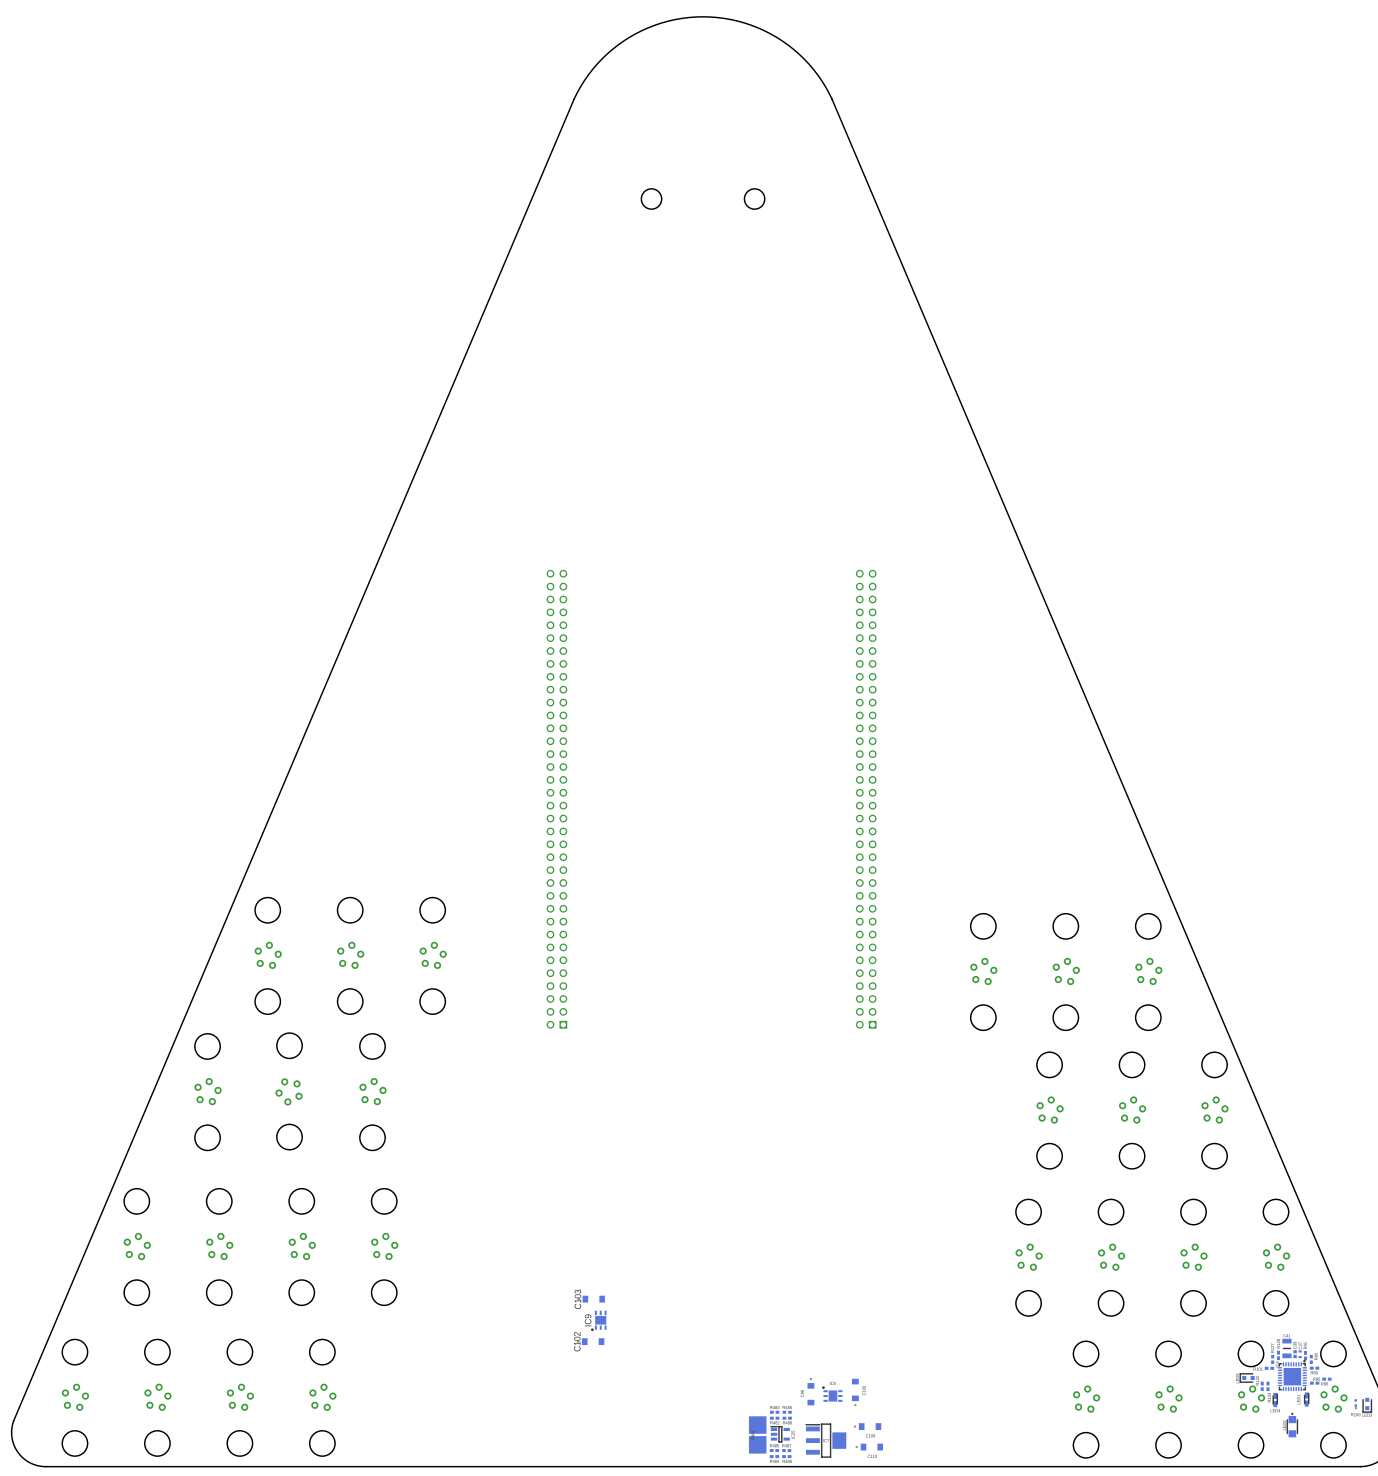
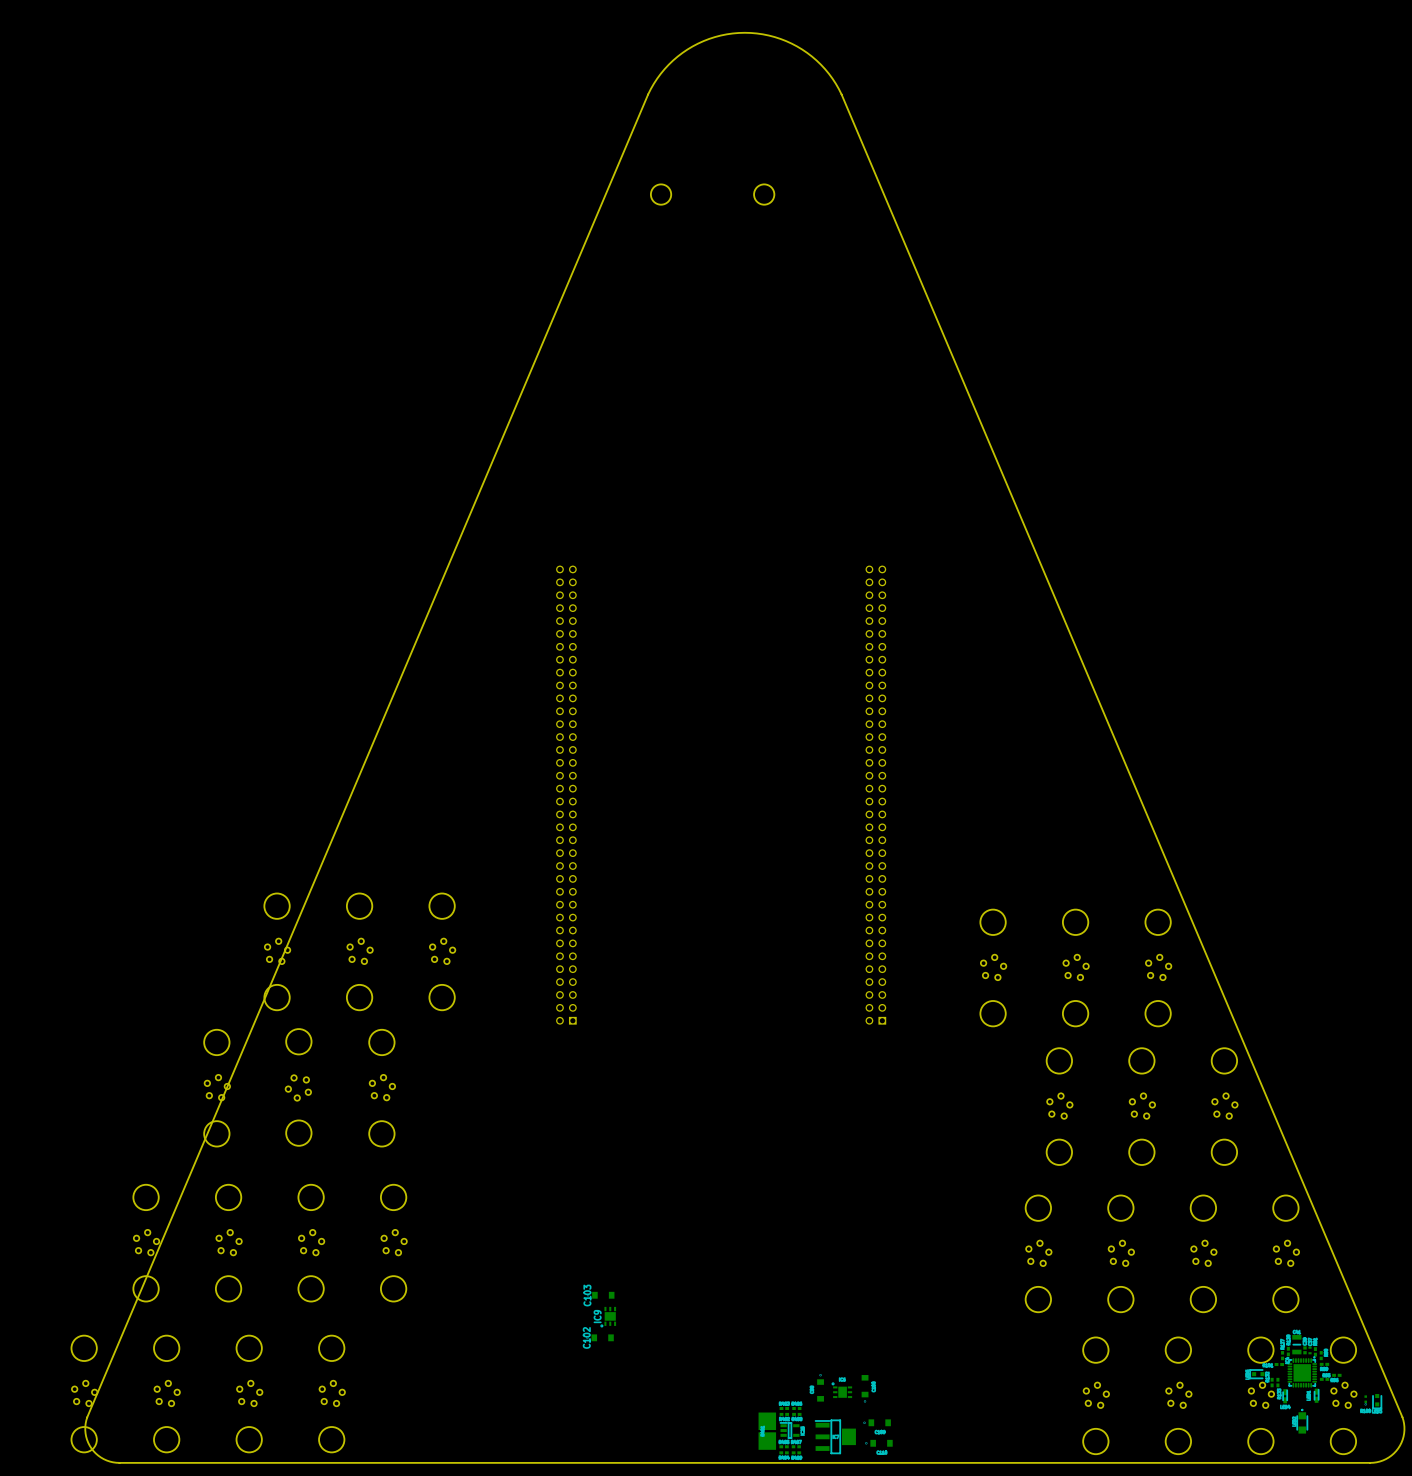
board edge: (831, 98) (821, 80) (808, 63) (782, 41) (764, 30) (744, 23) (724, 18) (703, 16) (682, 18) (661, 23) (629, 37) (612, 49) (597, 63) (577, 92) (13, 1421) (11, 1433) (14, 1446) (22, 1457) (30, 1462) (42, 1466) (110, 1466) -> (841, 94) (825, 69) (802, 49) (780, 38) (750, 32) (720, 35) (692, 46) (668, 64) (650, 88) (87, 1417) (85, 1433) (91, 1448) (103, 1459) (119, 1462)

